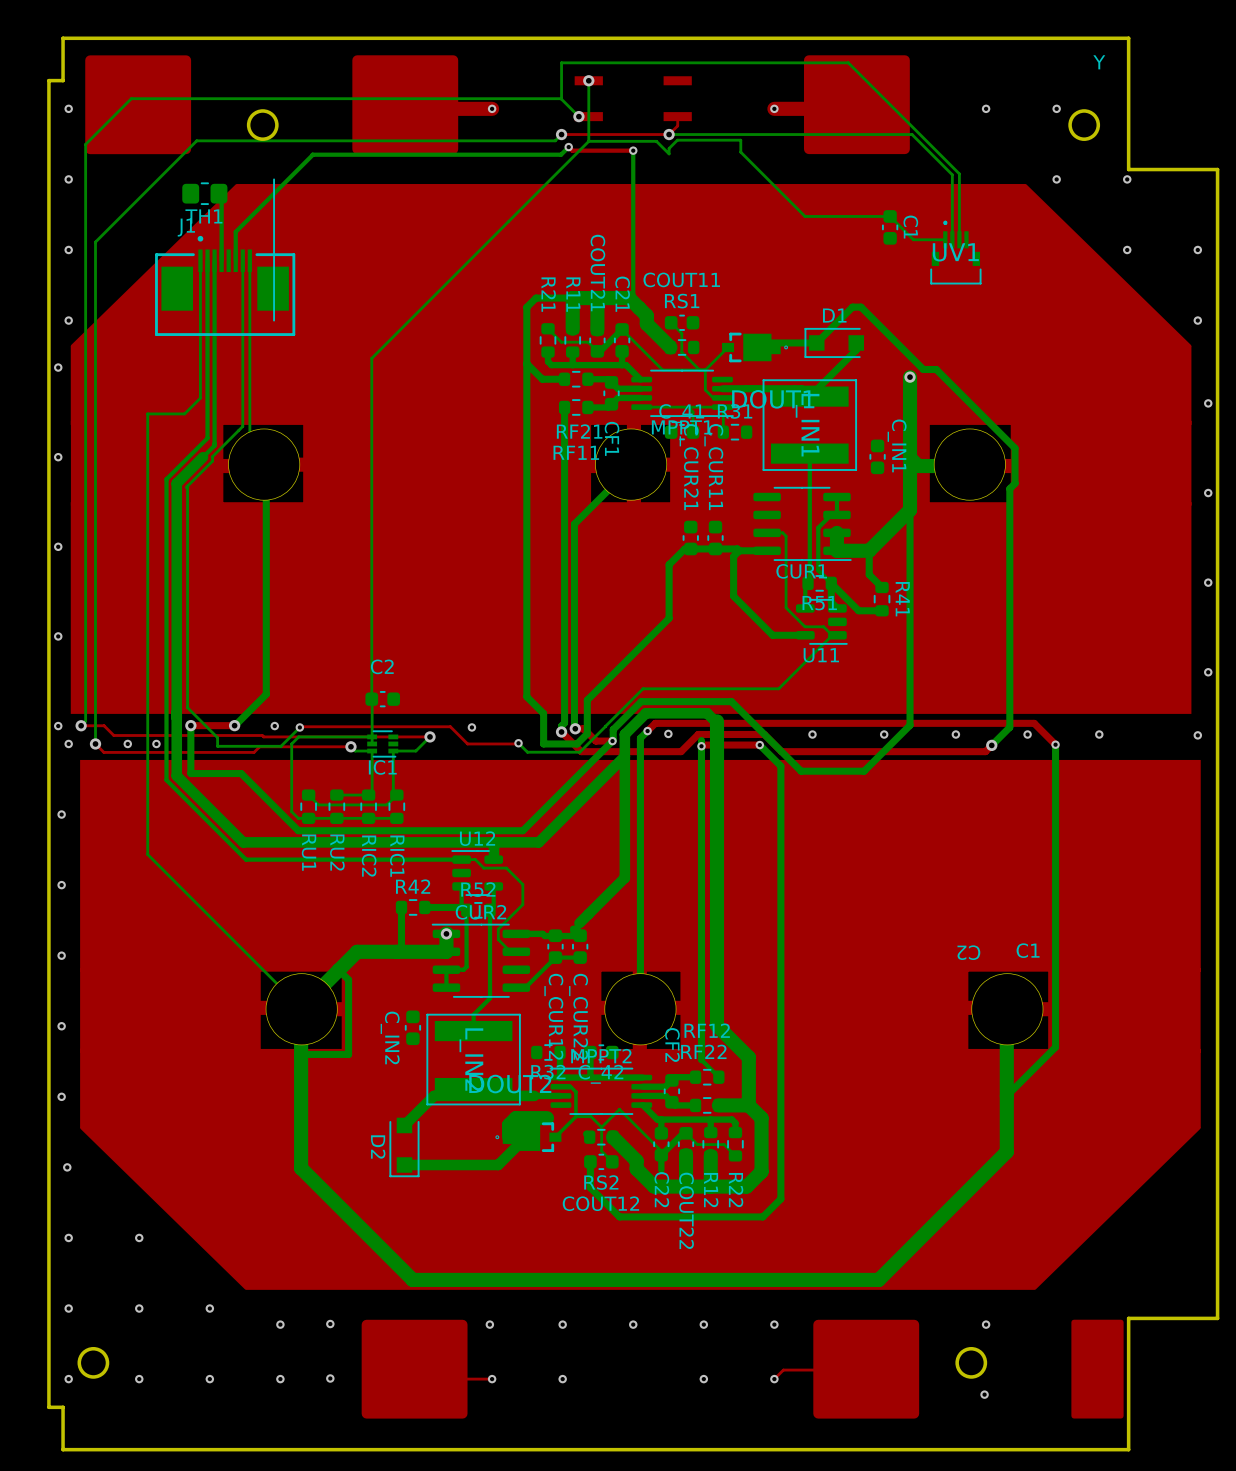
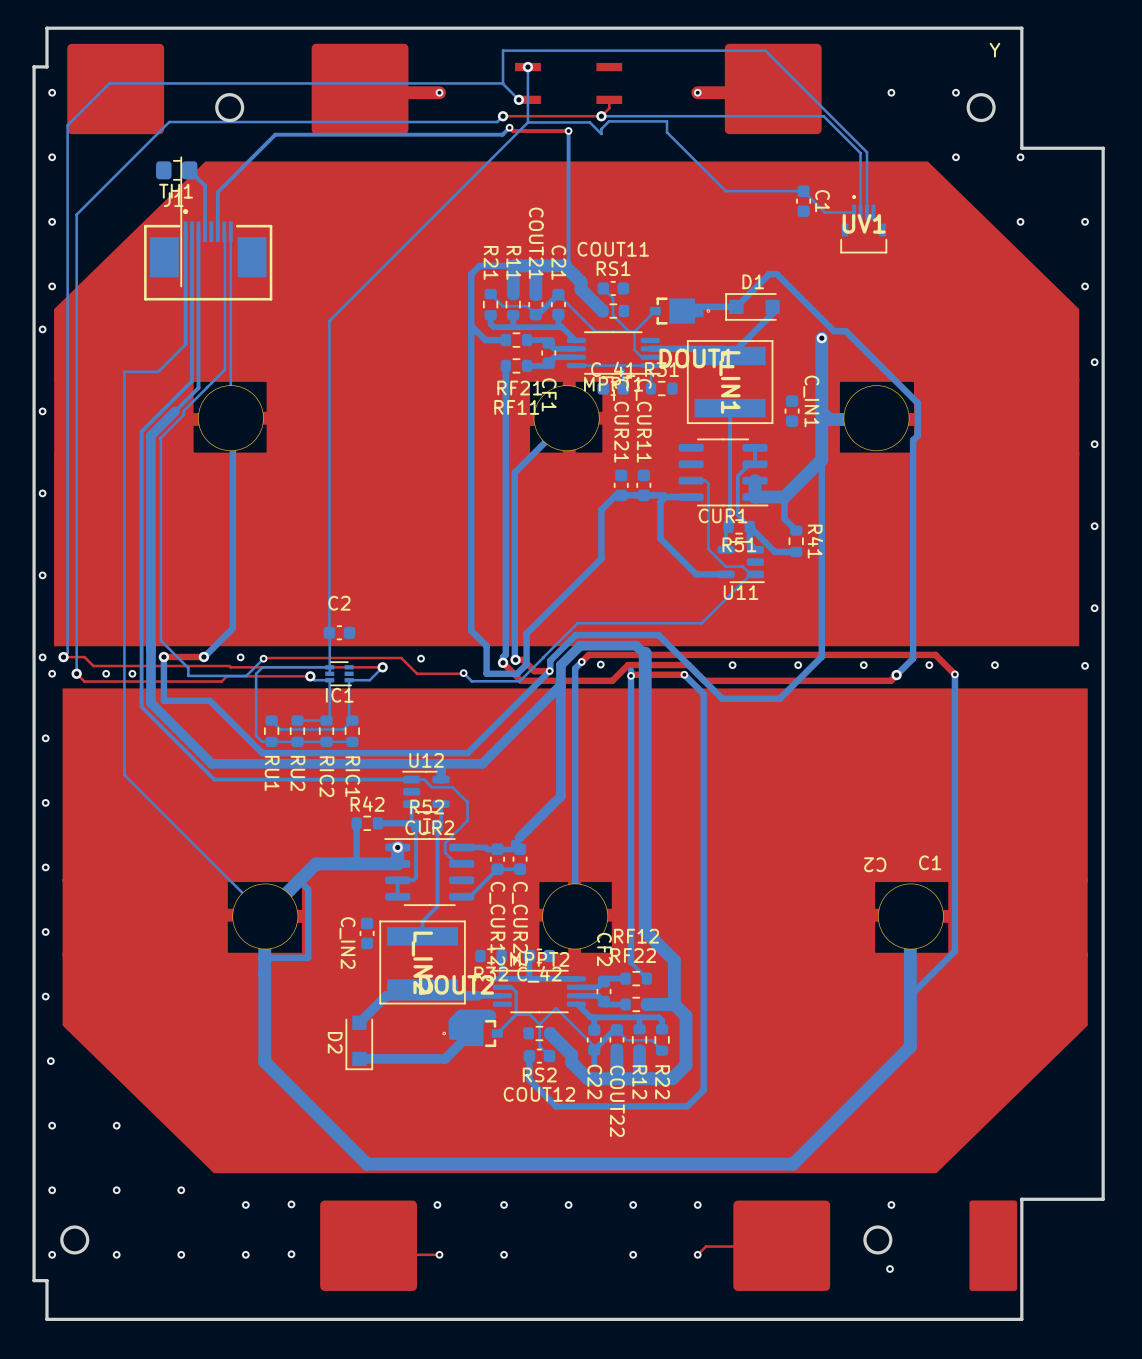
drawing shape: [47, 36, 1220, 1452] -> [32, 26, 1105, 1321]
bottom track: (312, 154) (235, 231) -> (275, 134) (217, 192) (217, 231)
bottom track: (221, 196) (221, 260) -> (192, 172) (204, 185) (204, 205)
bottom track: (200, 260) (200, 398) -> none
bottom track: (207, 260) (207, 438) -> (192, 231) (192, 381) (179, 394)
bottom track: none -> (198, 231) (198, 387) (185, 400)
bottom track: (242, 260) (242, 426) -> (224, 234) (224, 369) (211, 383)
bottom track: (249, 260) (249, 450) -> none
bottom track: none -> (230, 231) (230, 418)
J1 position: (225, 285) -> (208, 254)
bottom track: (214, 384) (214, 445) -> (185, 344) (172, 357)

